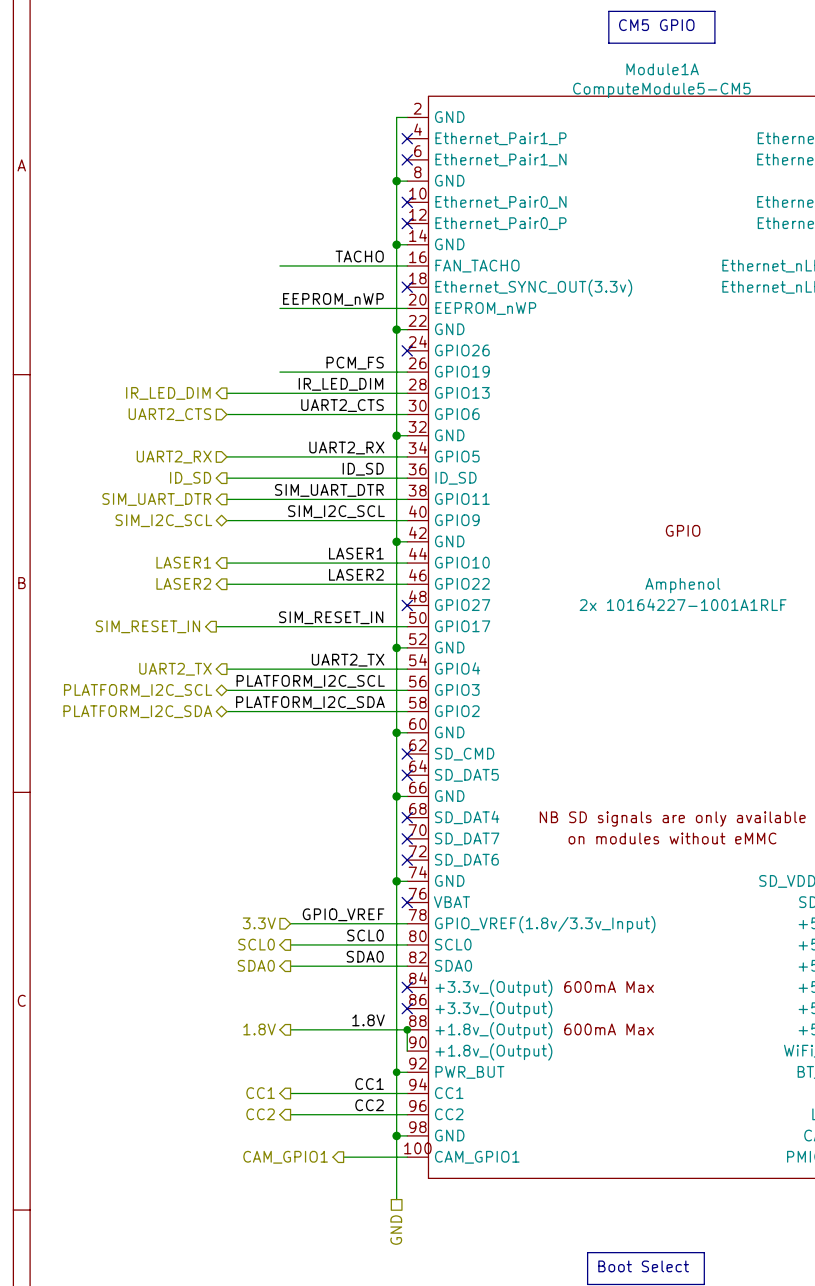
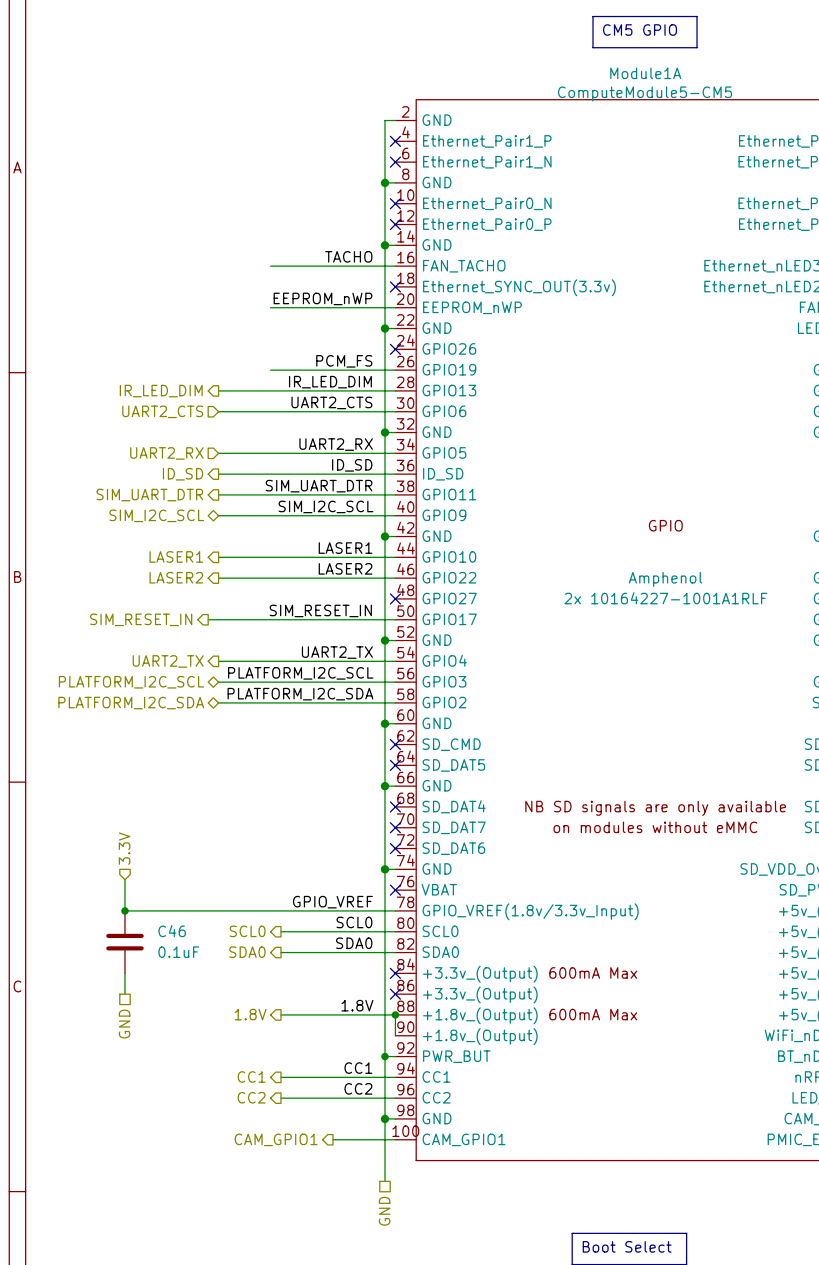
wire: none -> (124, 879) (124, 910) (280, 910)
junction: none -> (124, 910)
hierarchical label rotation: 0° (259, 923) -> 90° clockwise (124, 848)
hierarchical label position: 3.3V (259, 923) -> 3.3V (124, 848)
C46: none -> 0.1uF (124, 942)
wire: none -> (124, 973) (124, 994)
hierarchical label: none -> GND (124, 1024)

